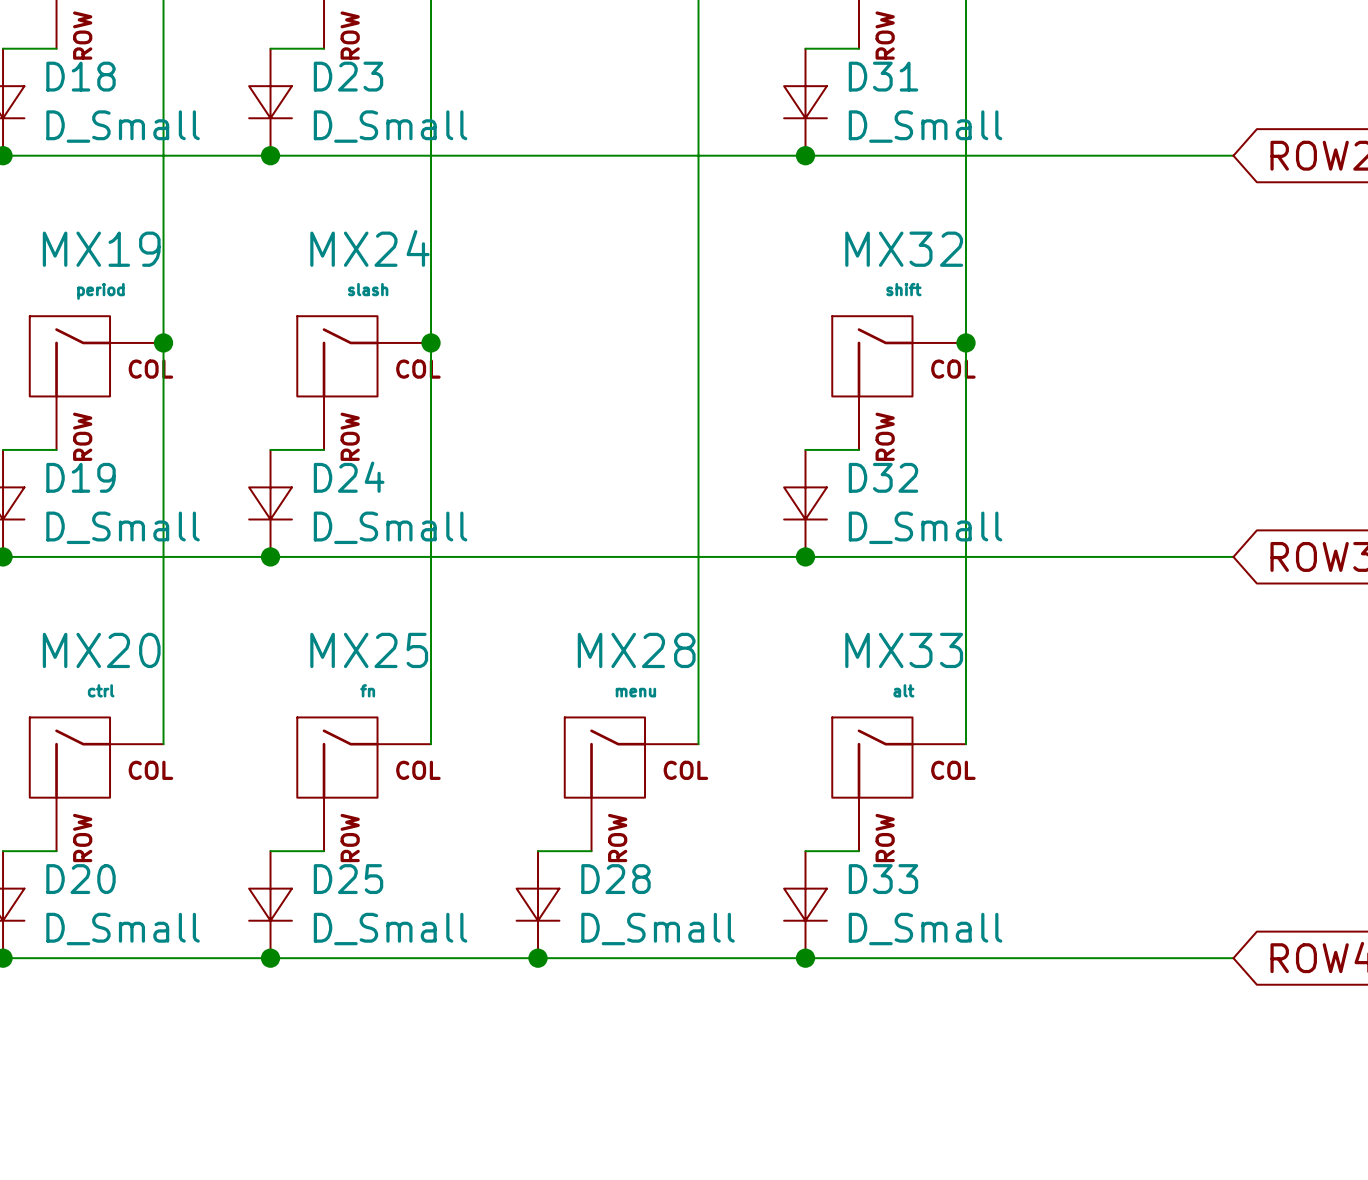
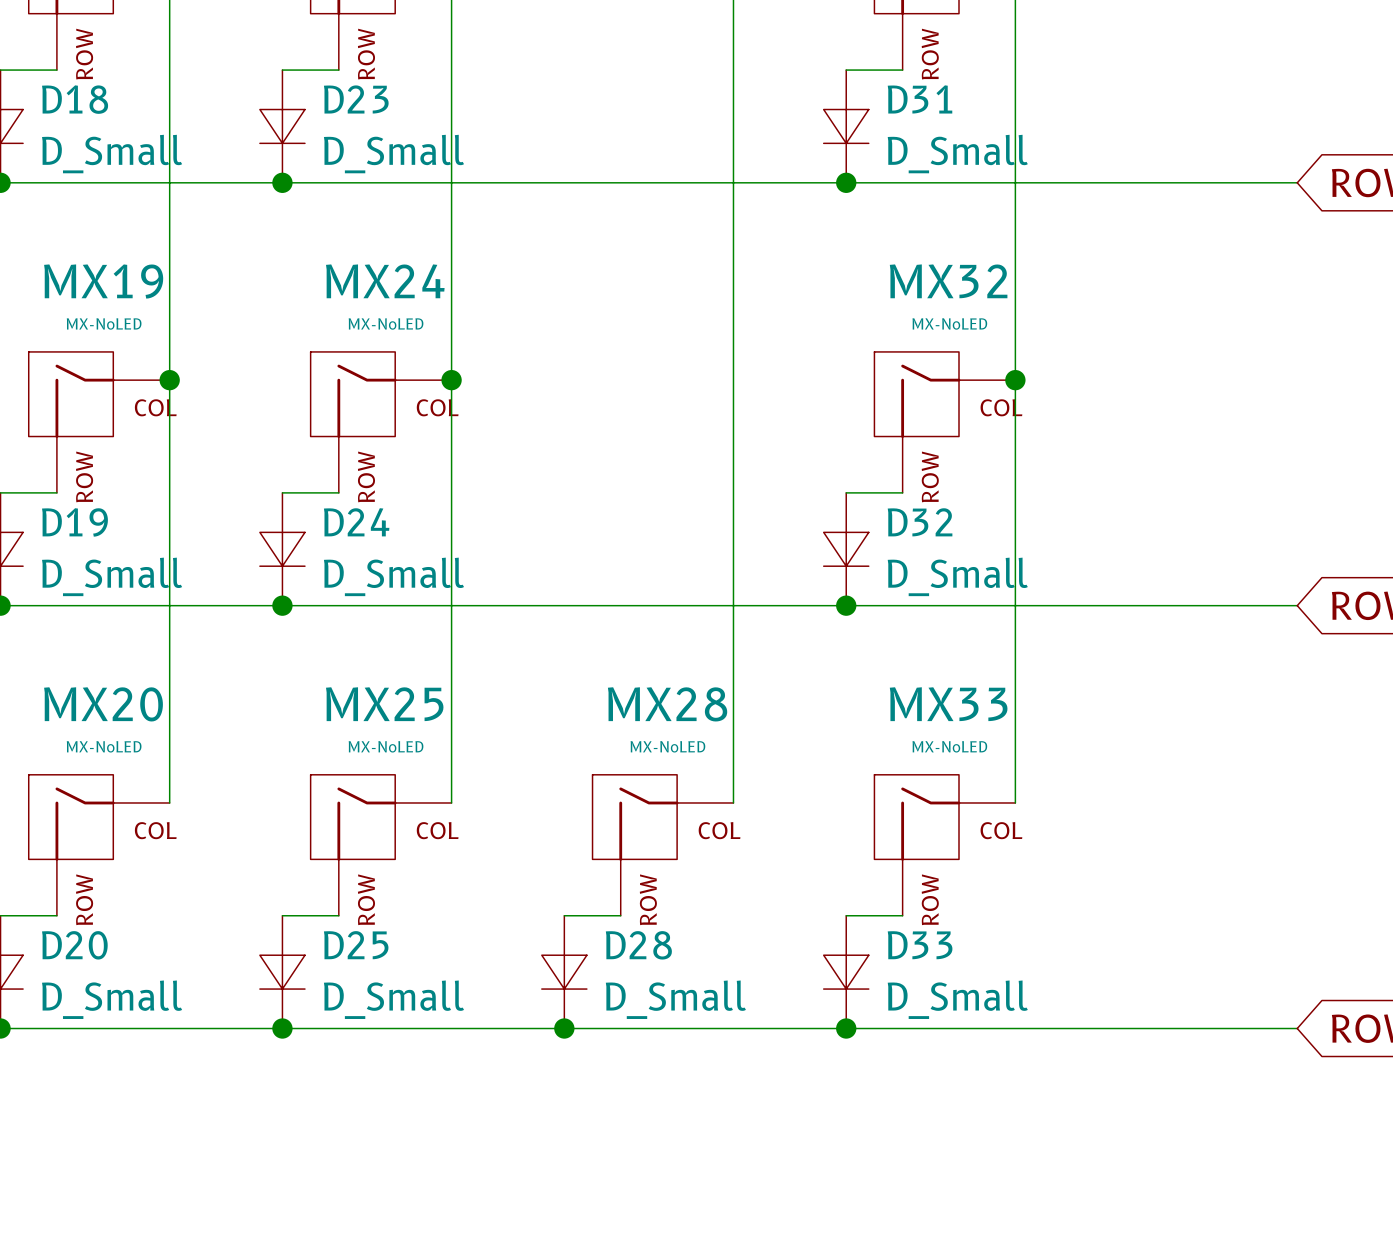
MX24 value: slash (368, 289) -> MX-NoLED (386, 323)
MX32 value: shift (903, 289) -> MX-NoLED (949, 323)
MX19 value: period (100, 291) -> MX-NoLED (104, 323)
MX20 value: ctrl (101, 690) -> MX-NoLED (104, 746)
MX25 value: fn (367, 690) -> MX-NoLED (386, 746)
MX33 value: alt (903, 690) -> MX-NoLED (949, 746)
MX28 value: menu (635, 692) -> MX-NoLED (667, 746)

